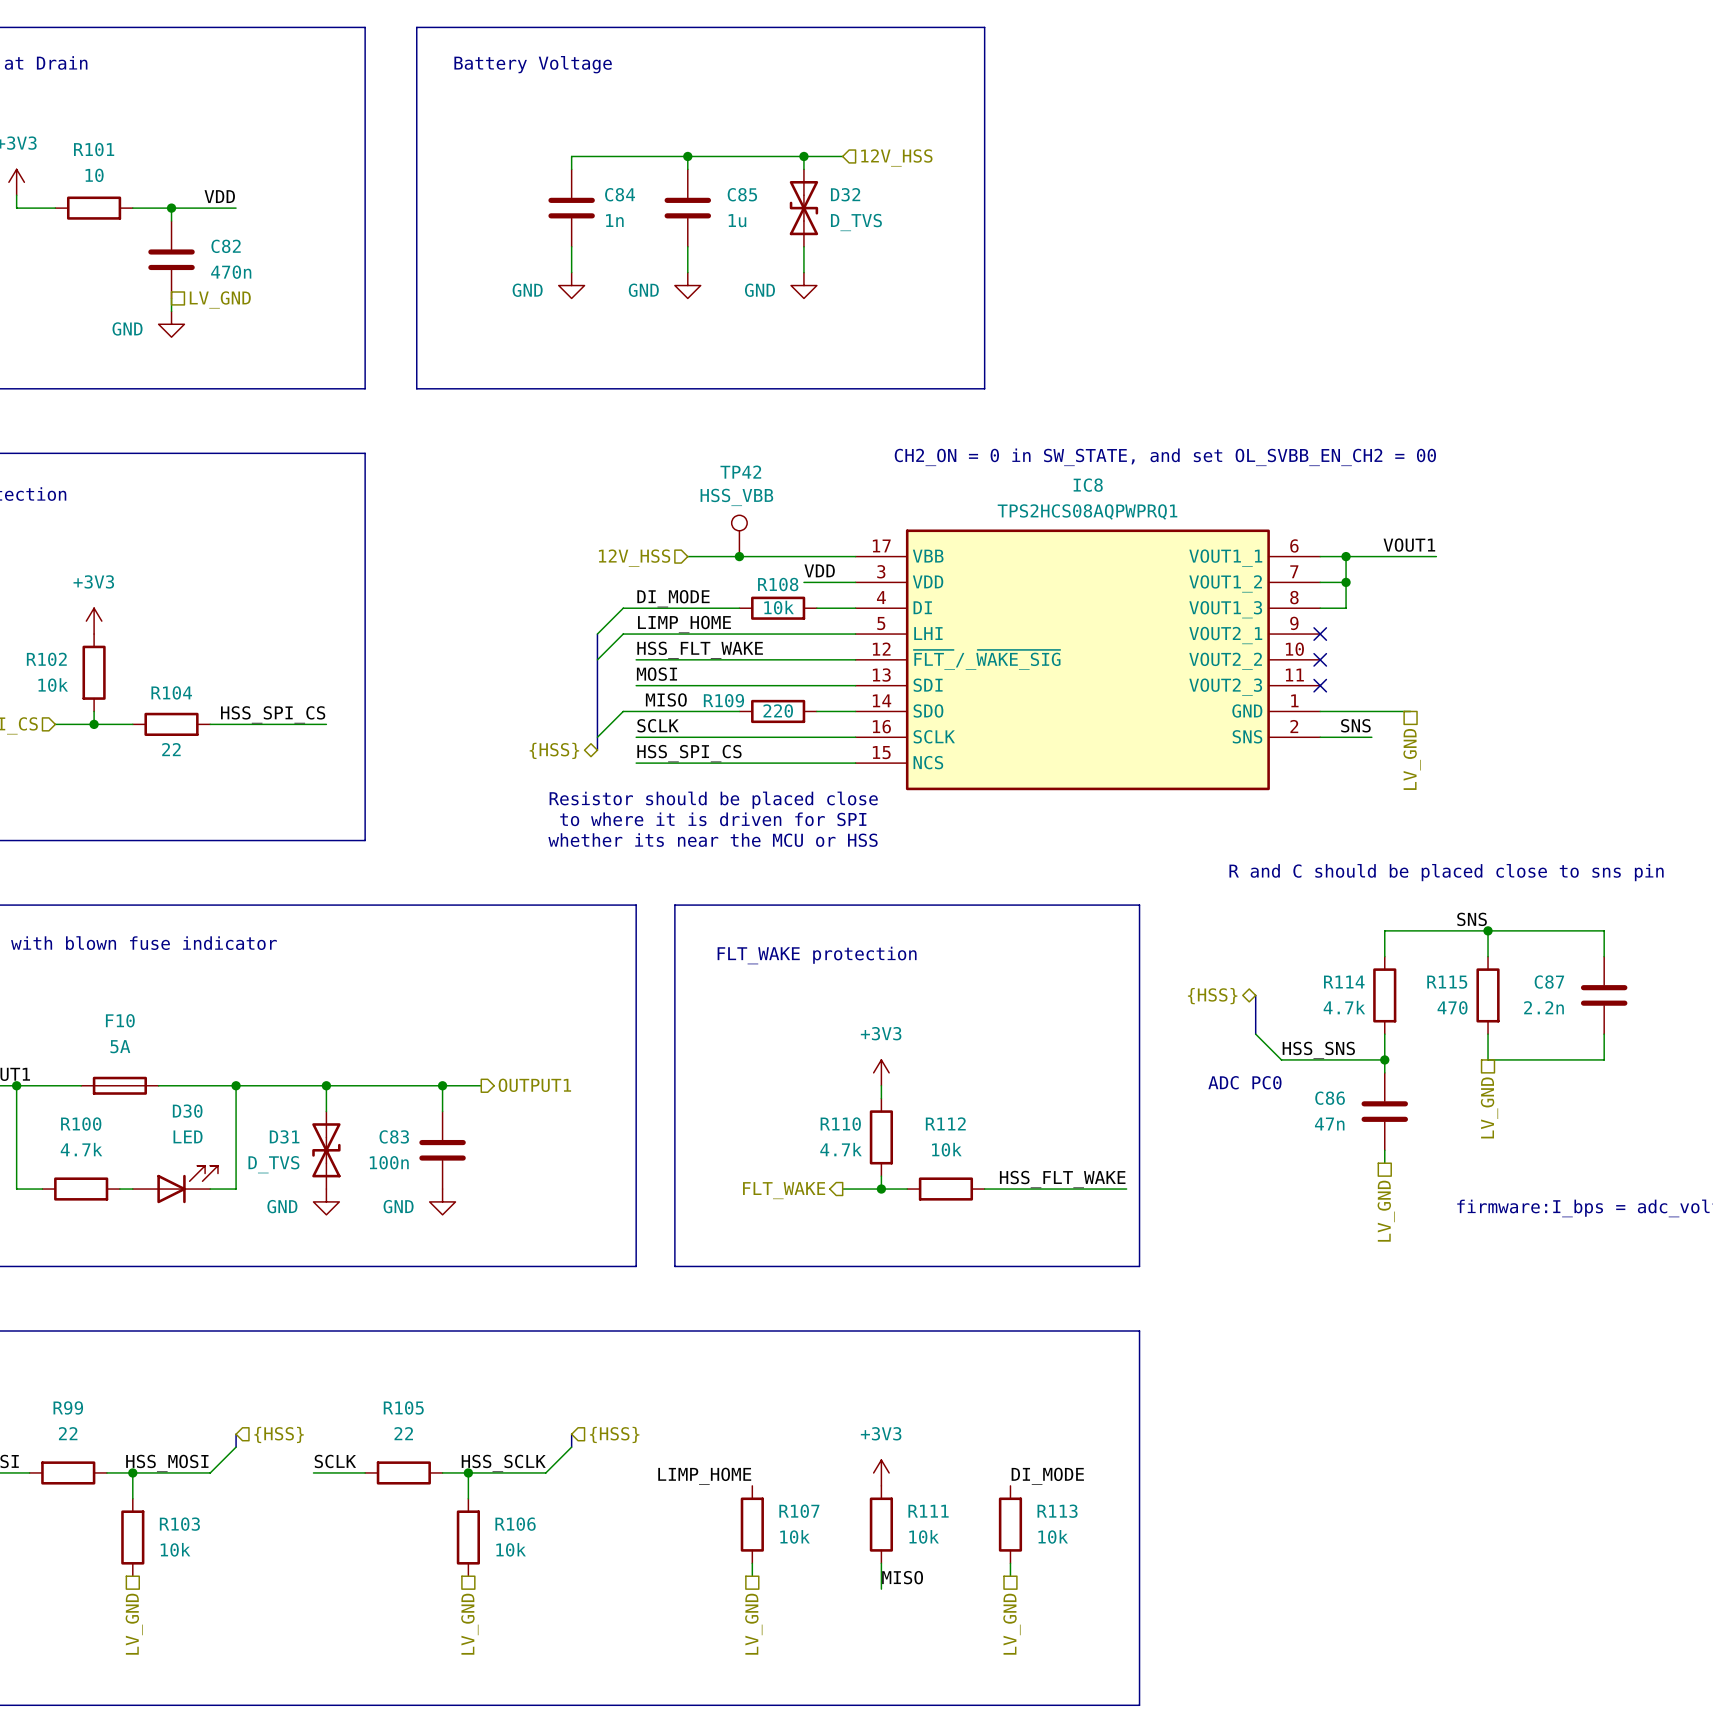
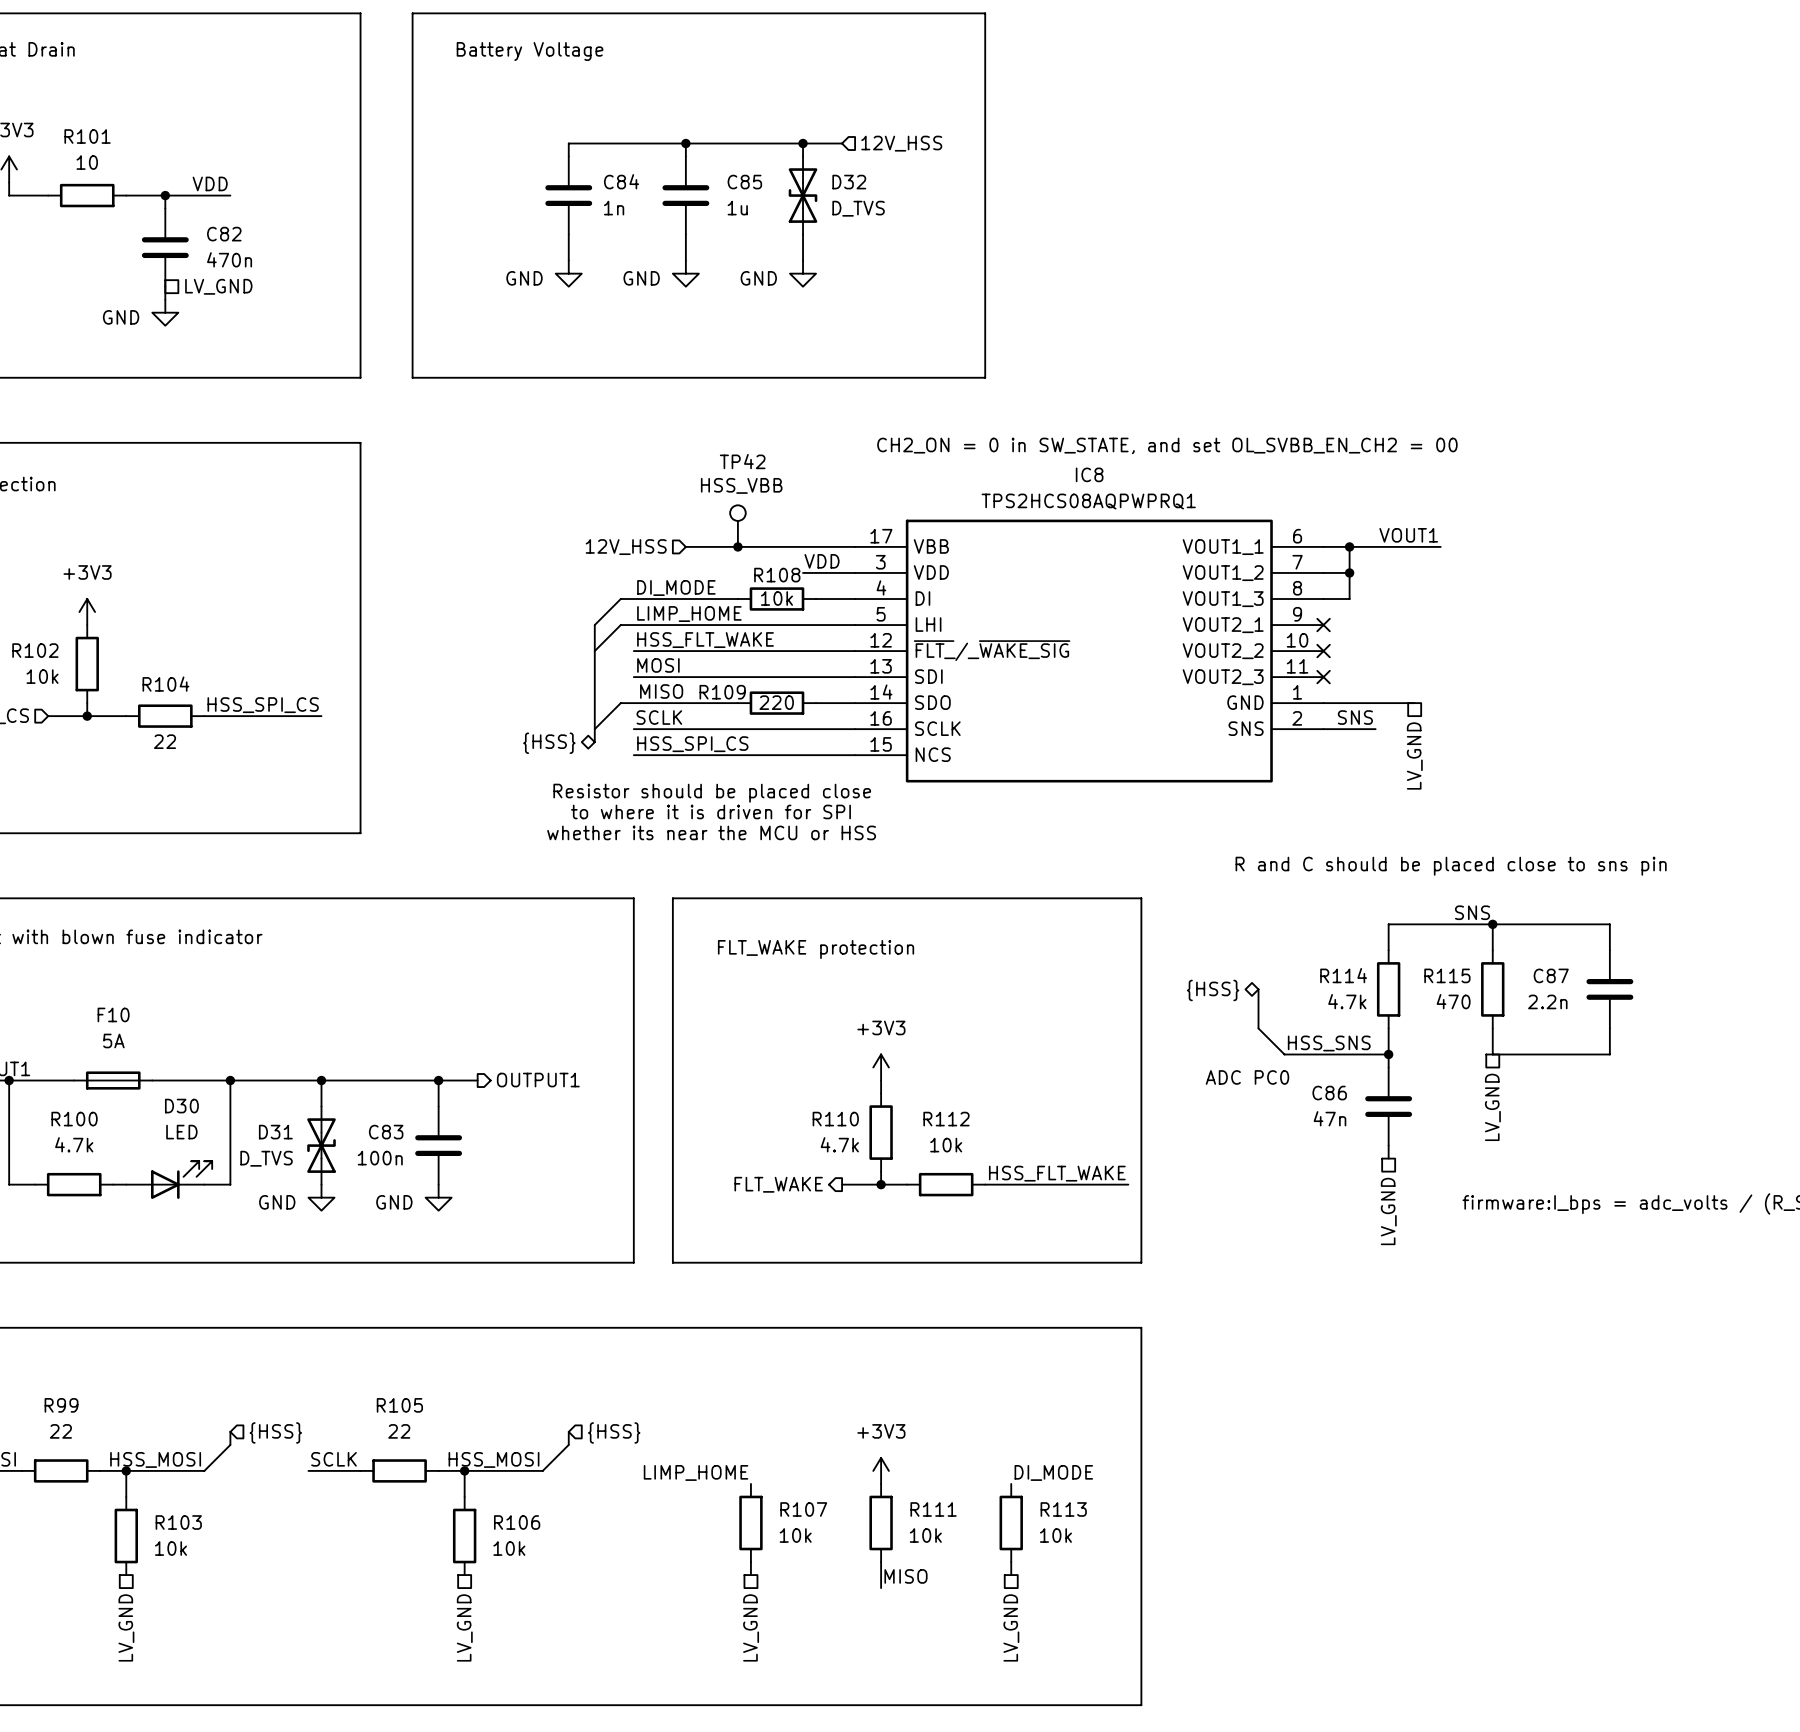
label: HSS_SCLK (503, 1463) -> HSS_MOSI (493, 1459)

